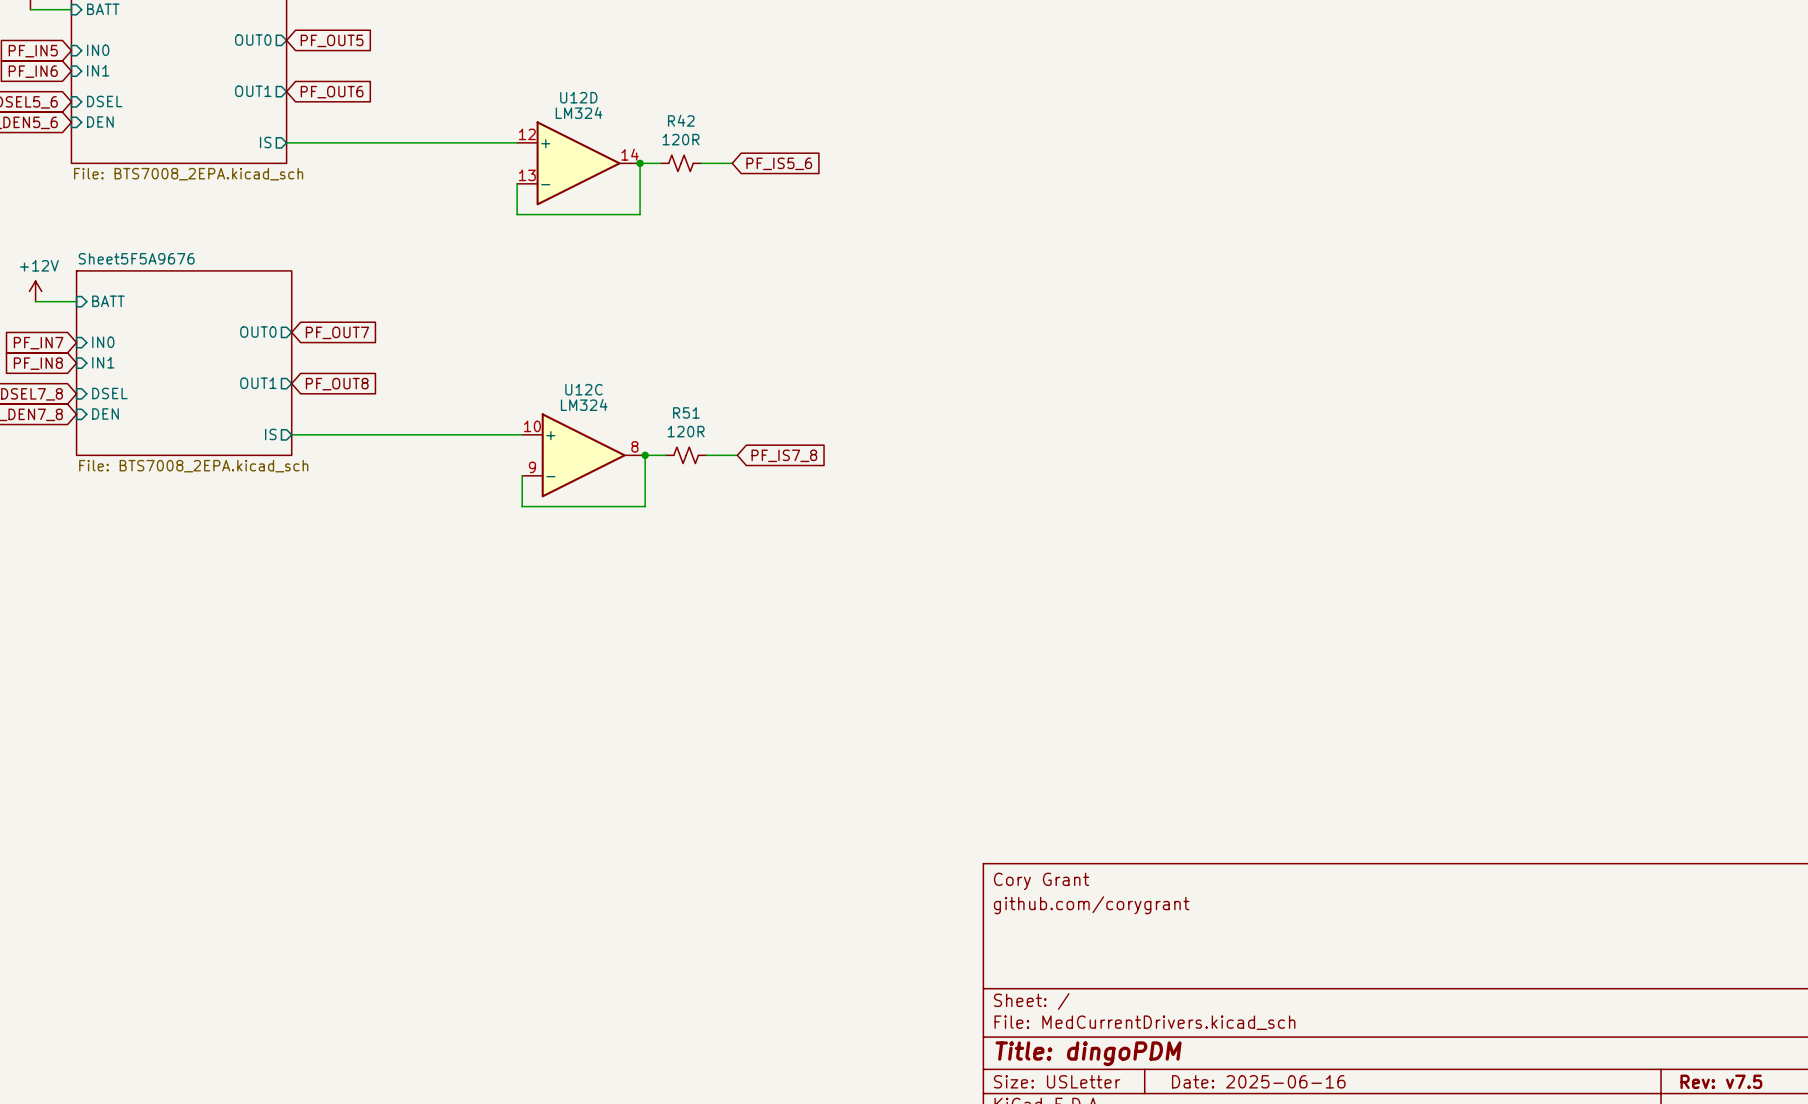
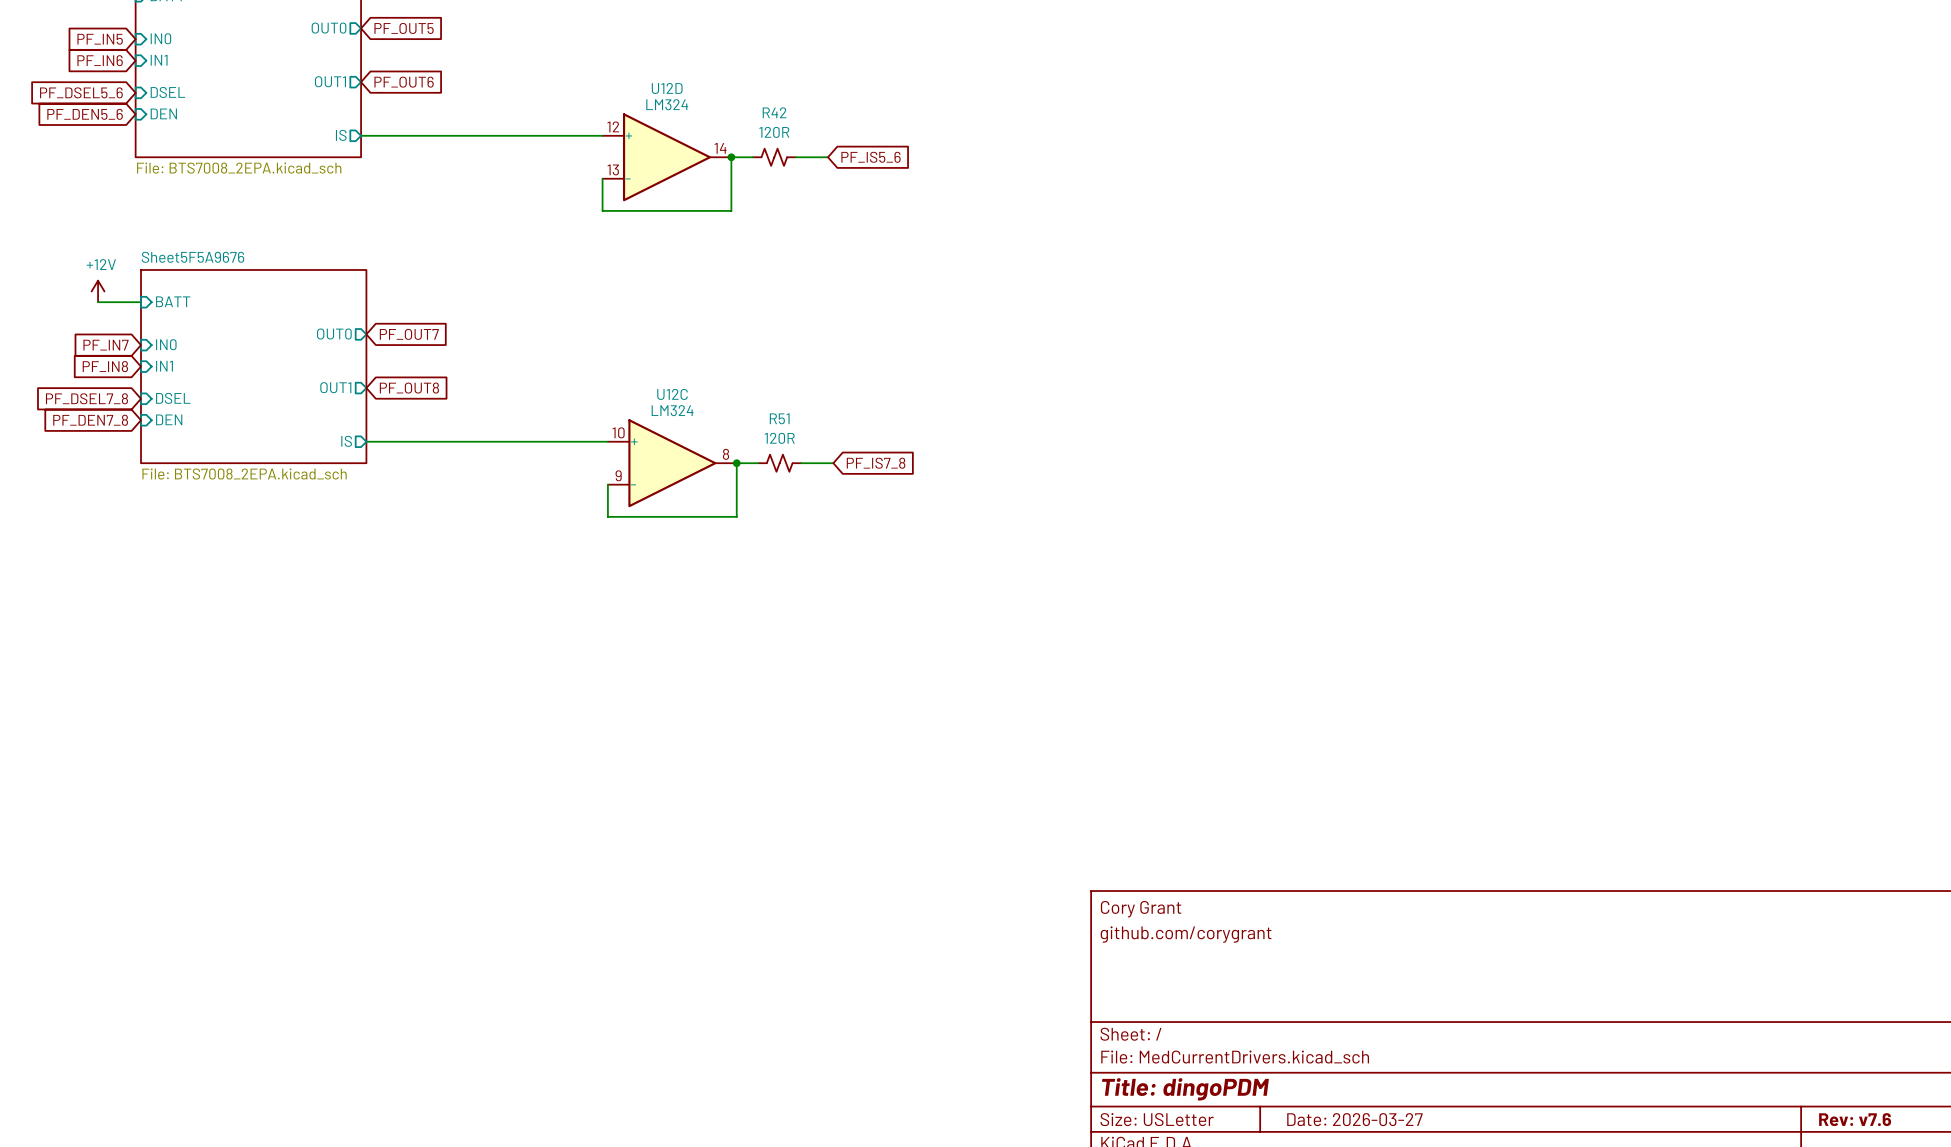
title block: Date: 2025-06-16 (1258, 1081) -> Date: 2026-03-27 (1354, 1119)
title block: Rev: v7.5 (1721, 1081) -> Rev: v7.6 (1855, 1119)

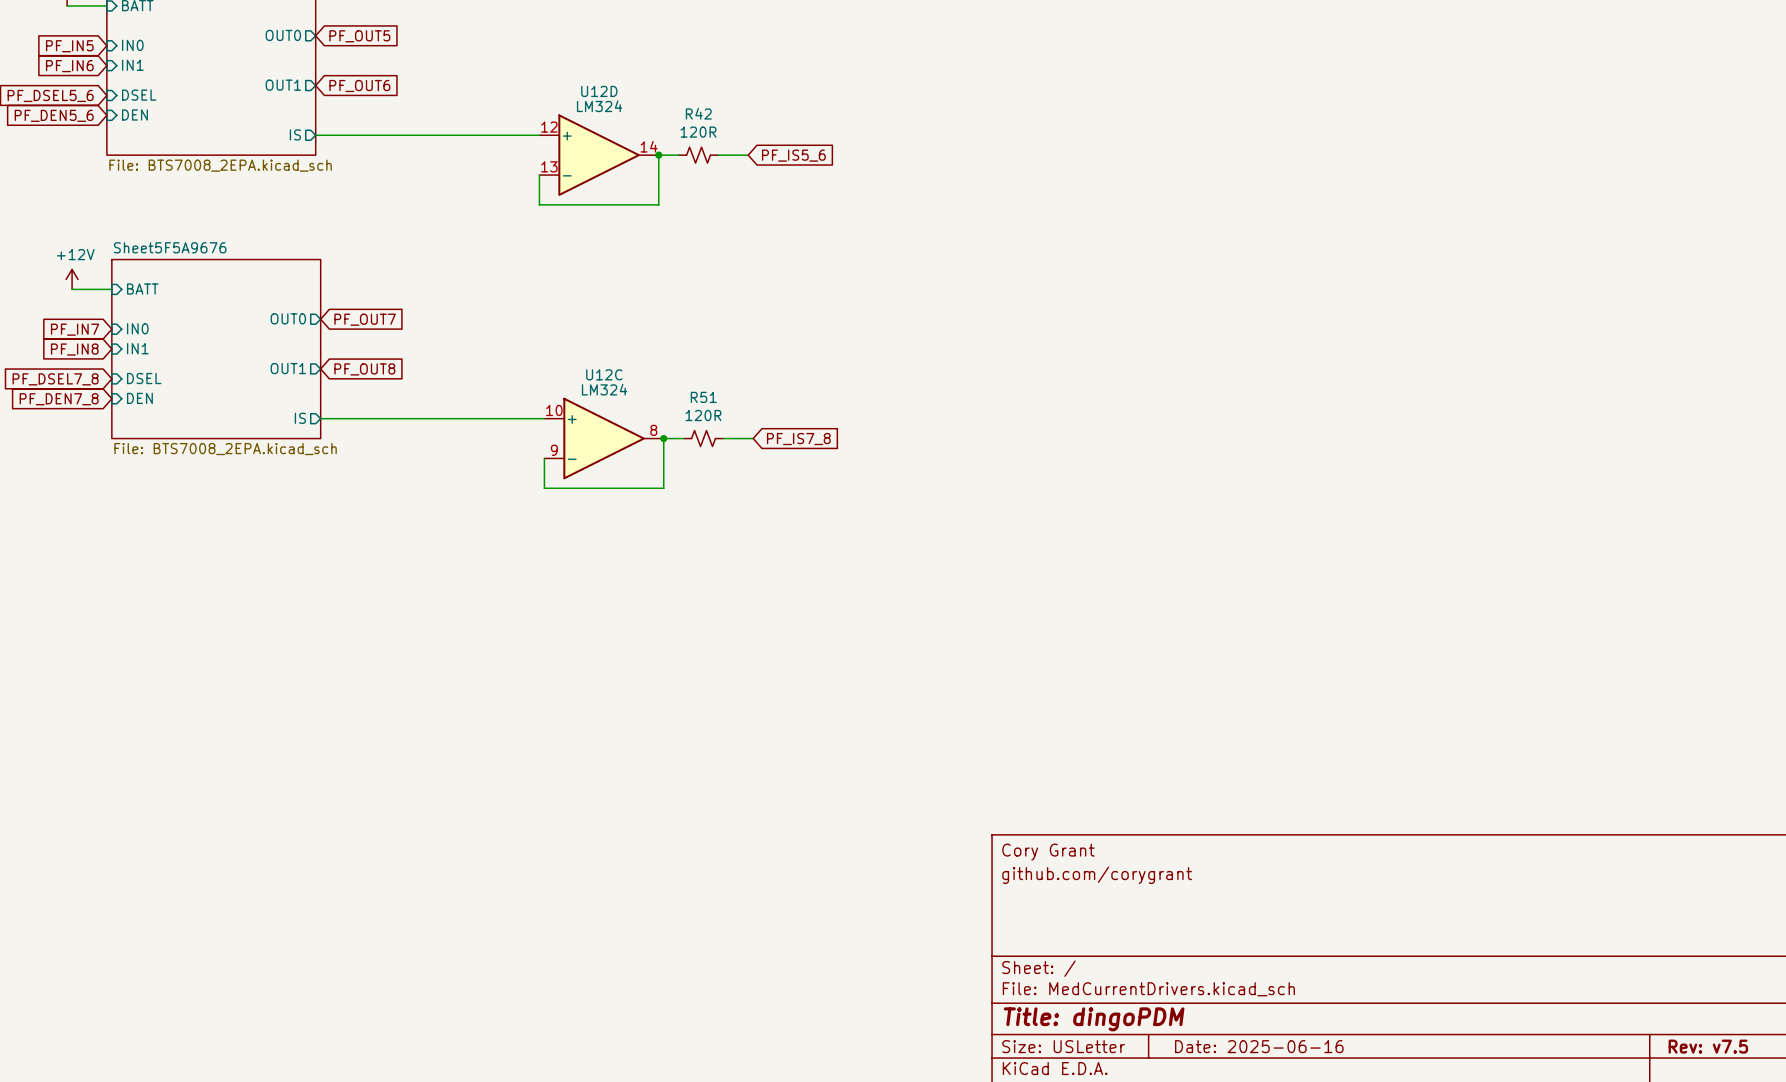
title block: Date: 2026-03-27 (1354, 1119) -> Date: 2025-06-16 (1259, 1046)
title block: Rev: v7.6 (1855, 1119) -> Rev: v7.5 (1708, 1046)

